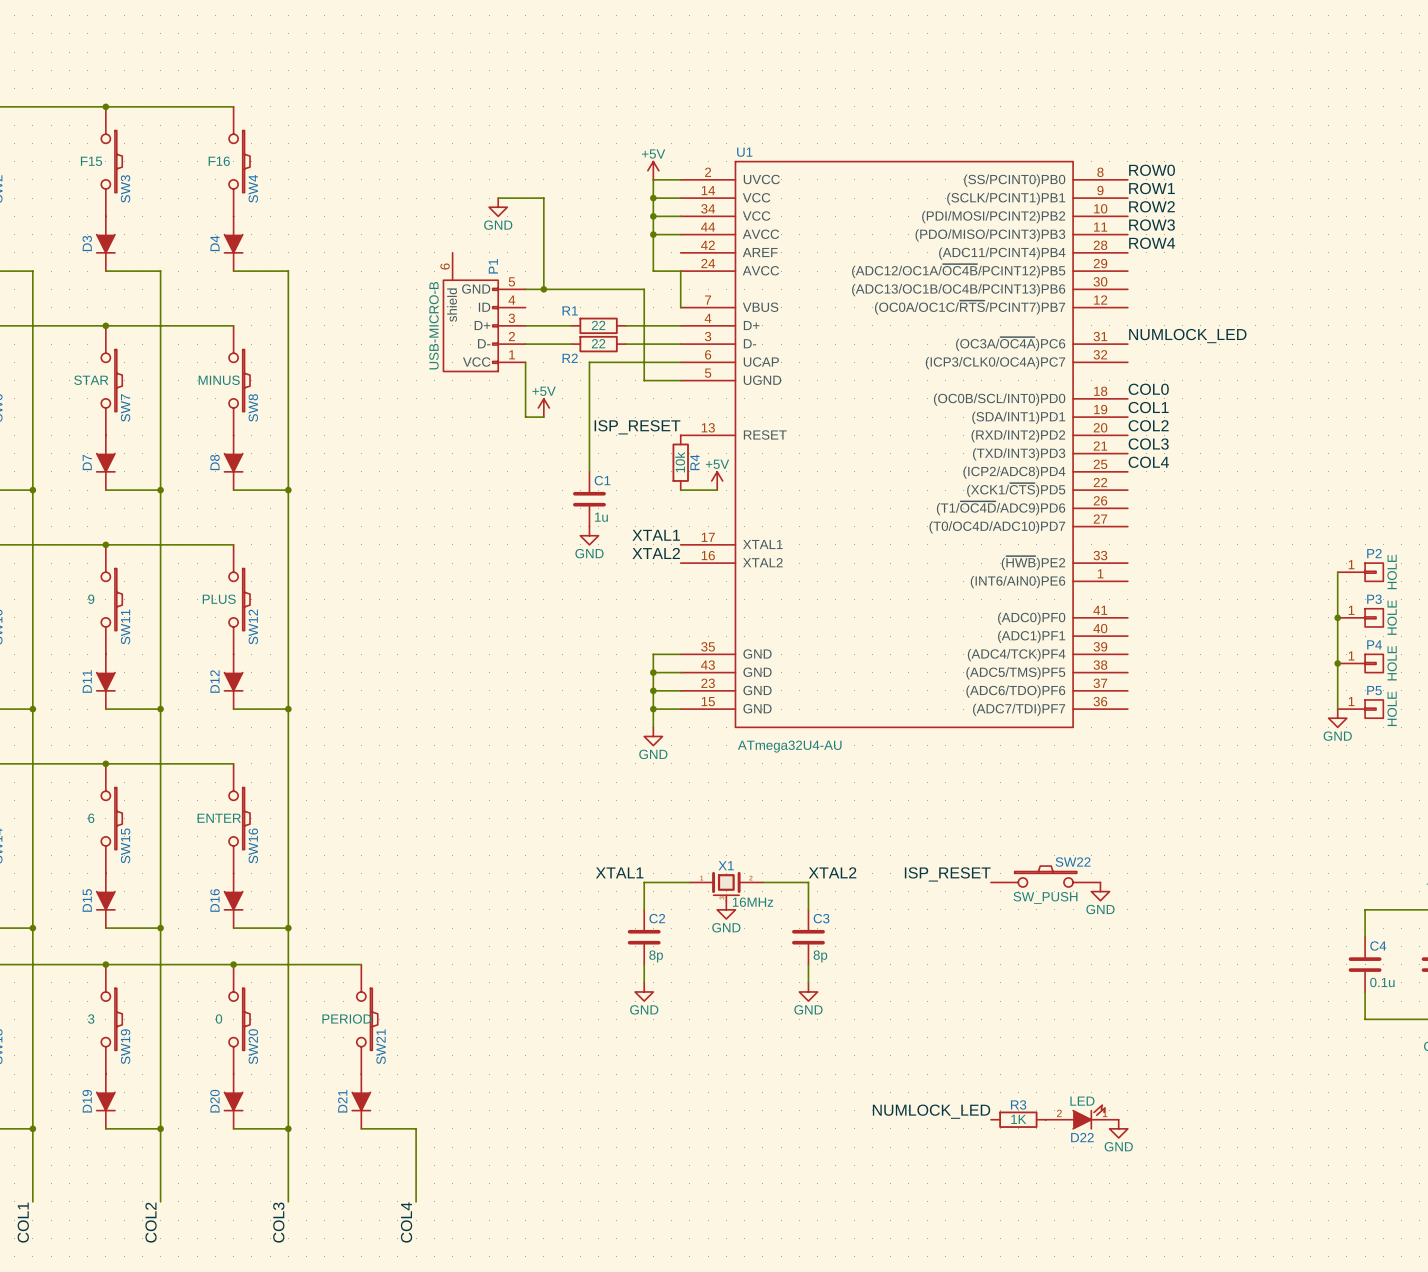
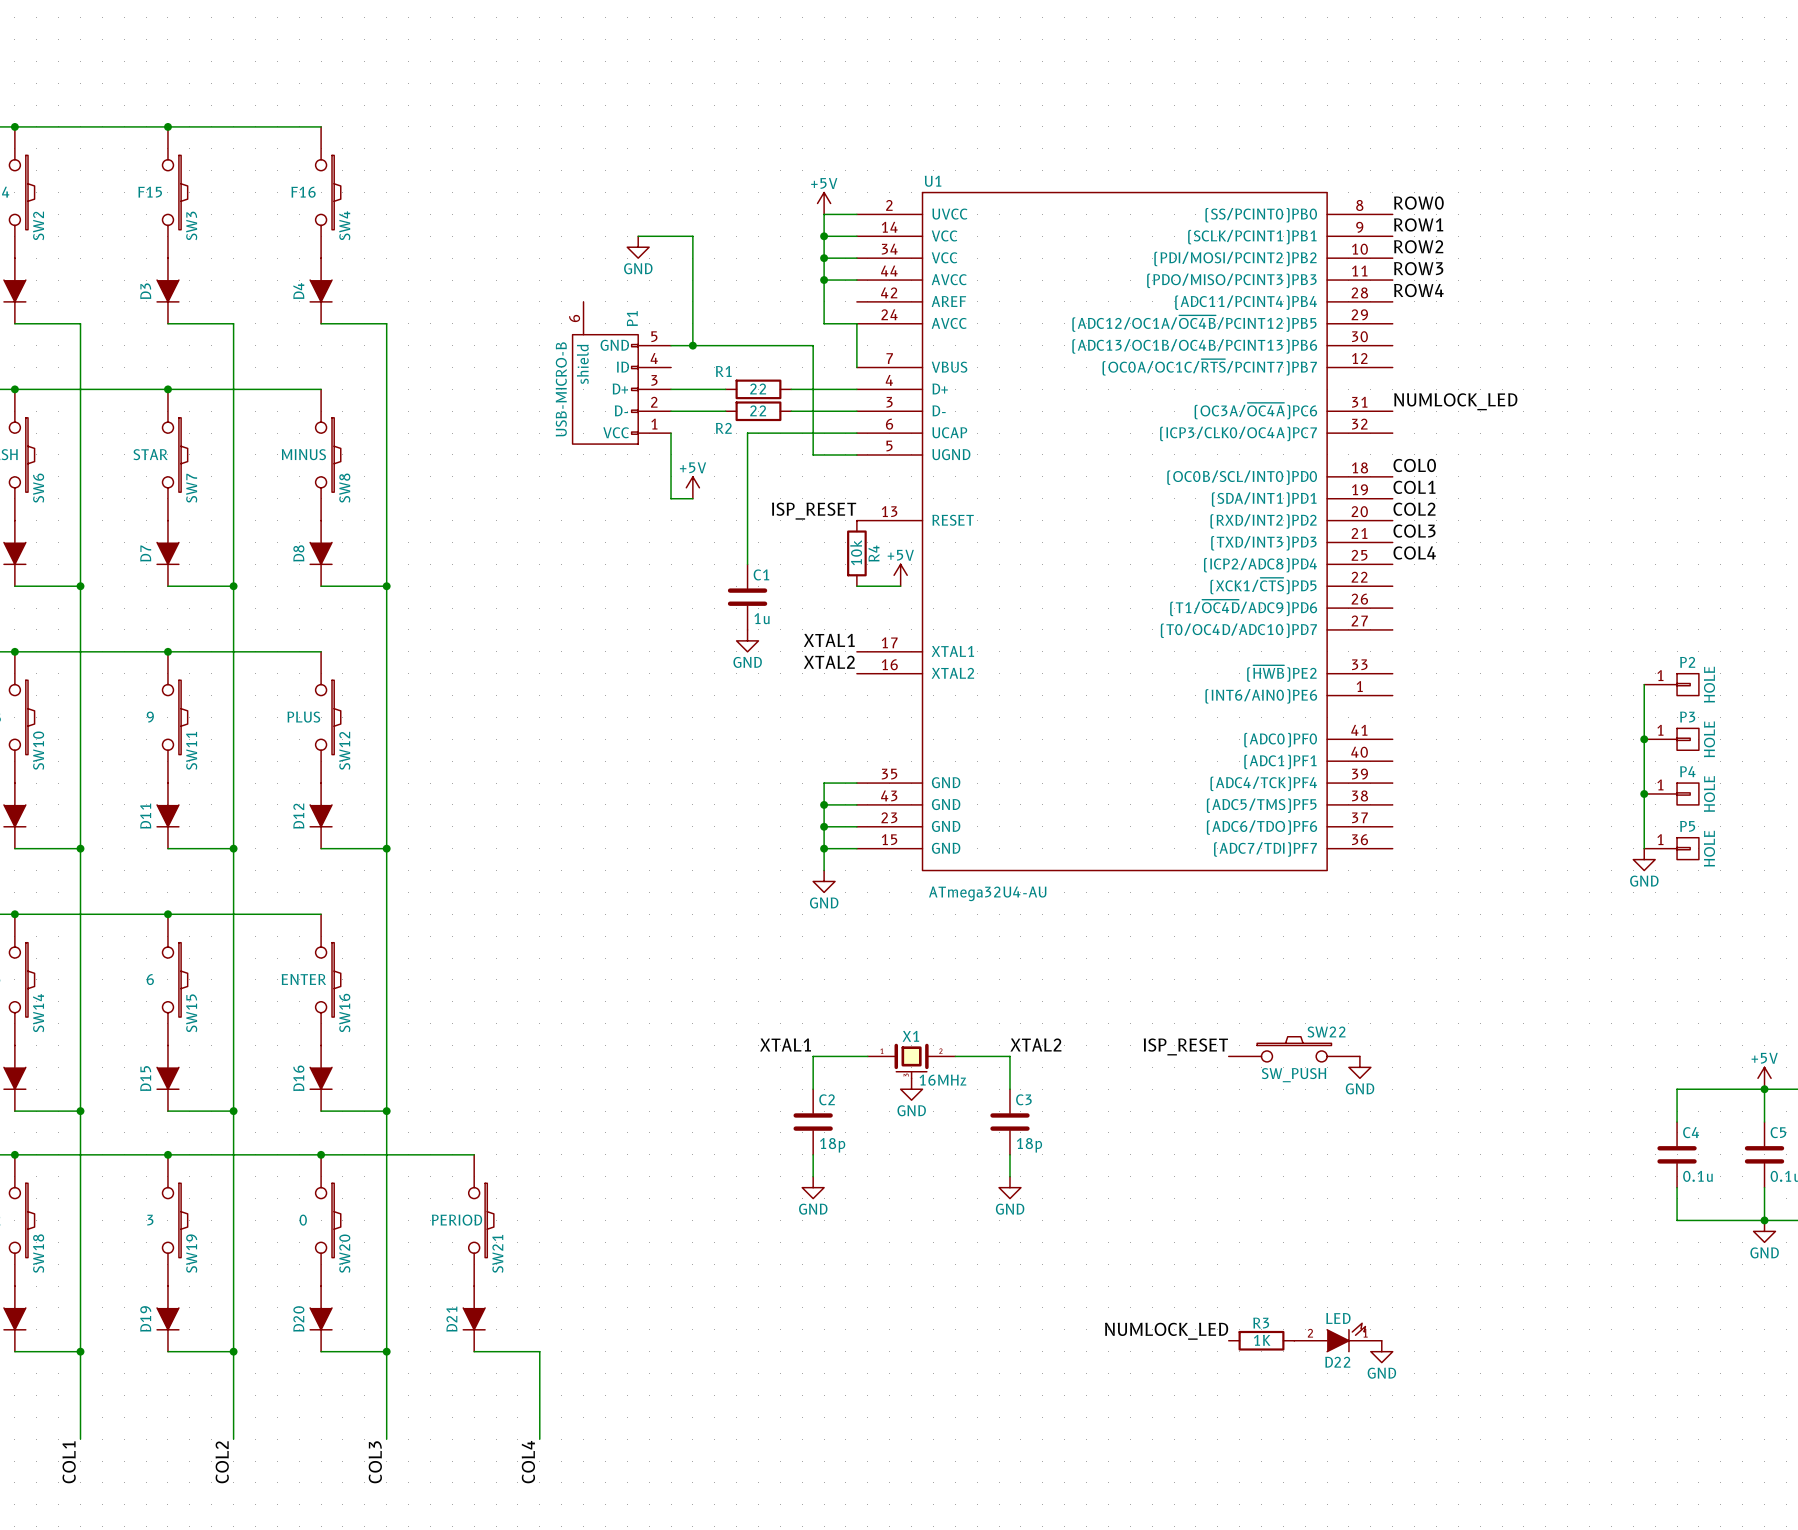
C2 value: 8p (656, 956) -> 18p (832, 1145)
C3 value: 8p (820, 956) -> 18p (1029, 1145)

